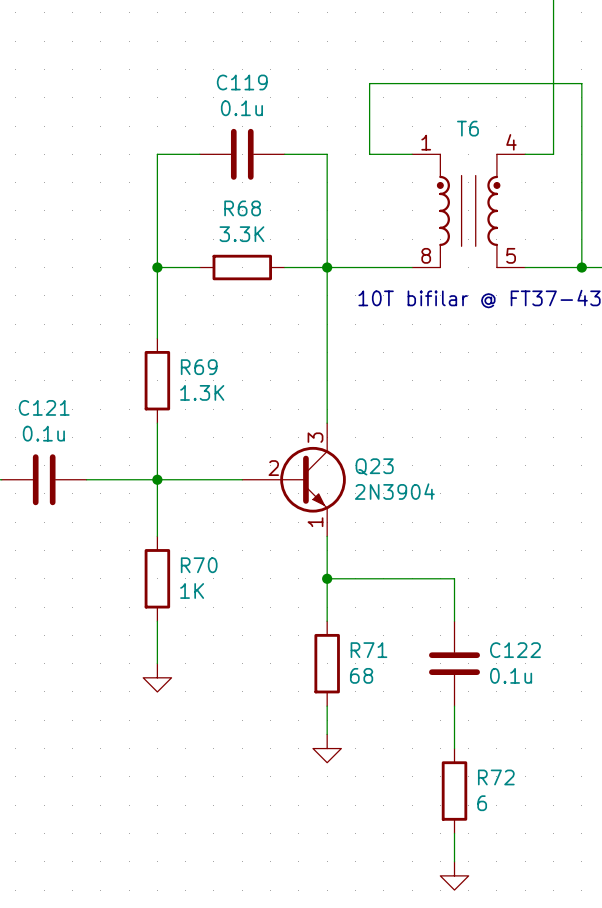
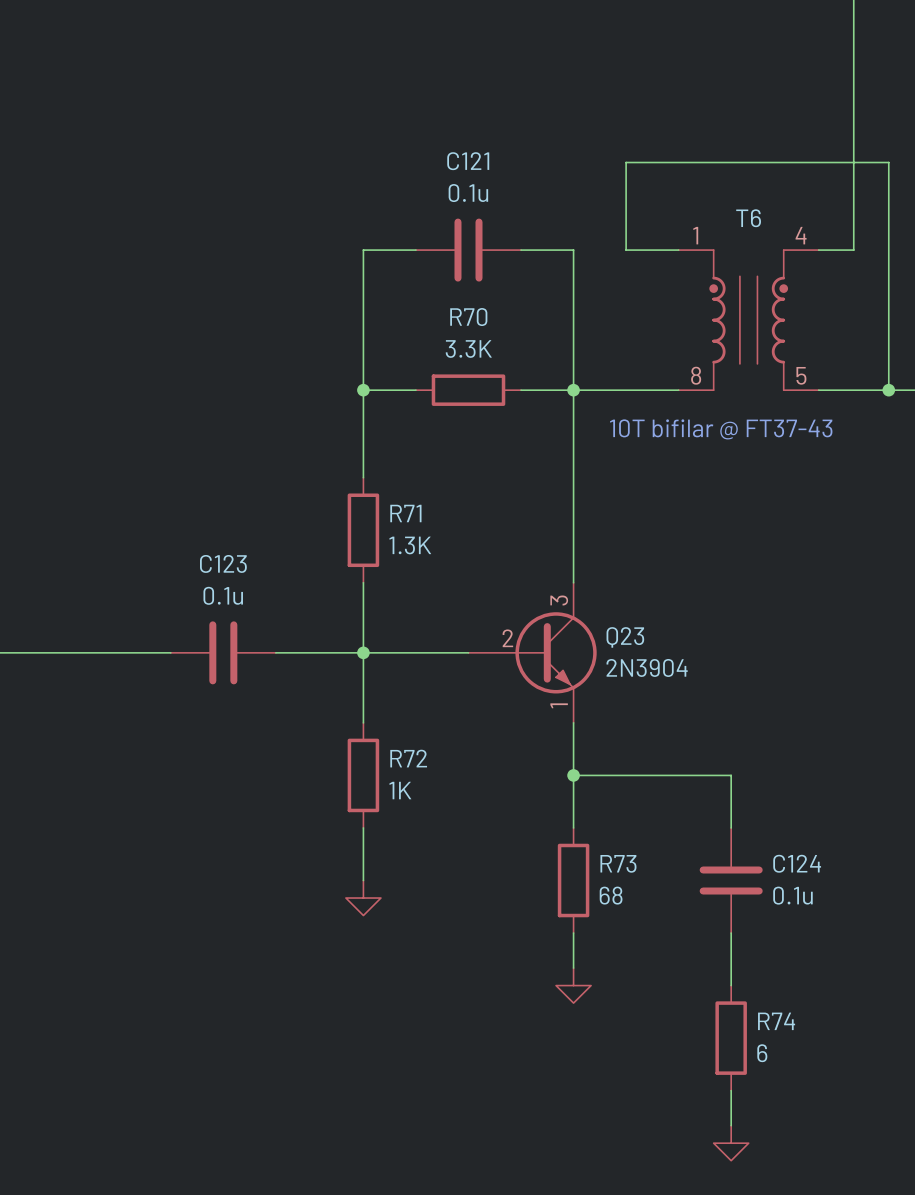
C119 name: C119 (242, 82) -> C121 (468, 161)
R68 name: R68 (242, 208) -> R70 (468, 317)
R69 name: R69 (199, 367) -> R71 (405, 513)
C121 name: C121 (44, 407) -> C123 (223, 563)
R70 name: R70 (199, 565) -> R72 (408, 758)
R71 name: R71 (368, 650) -> R73 (618, 863)
C122 name: C122 (515, 650) -> C124 (797, 863)
R72 name: R72 (496, 777) -> R74 (776, 1021)

